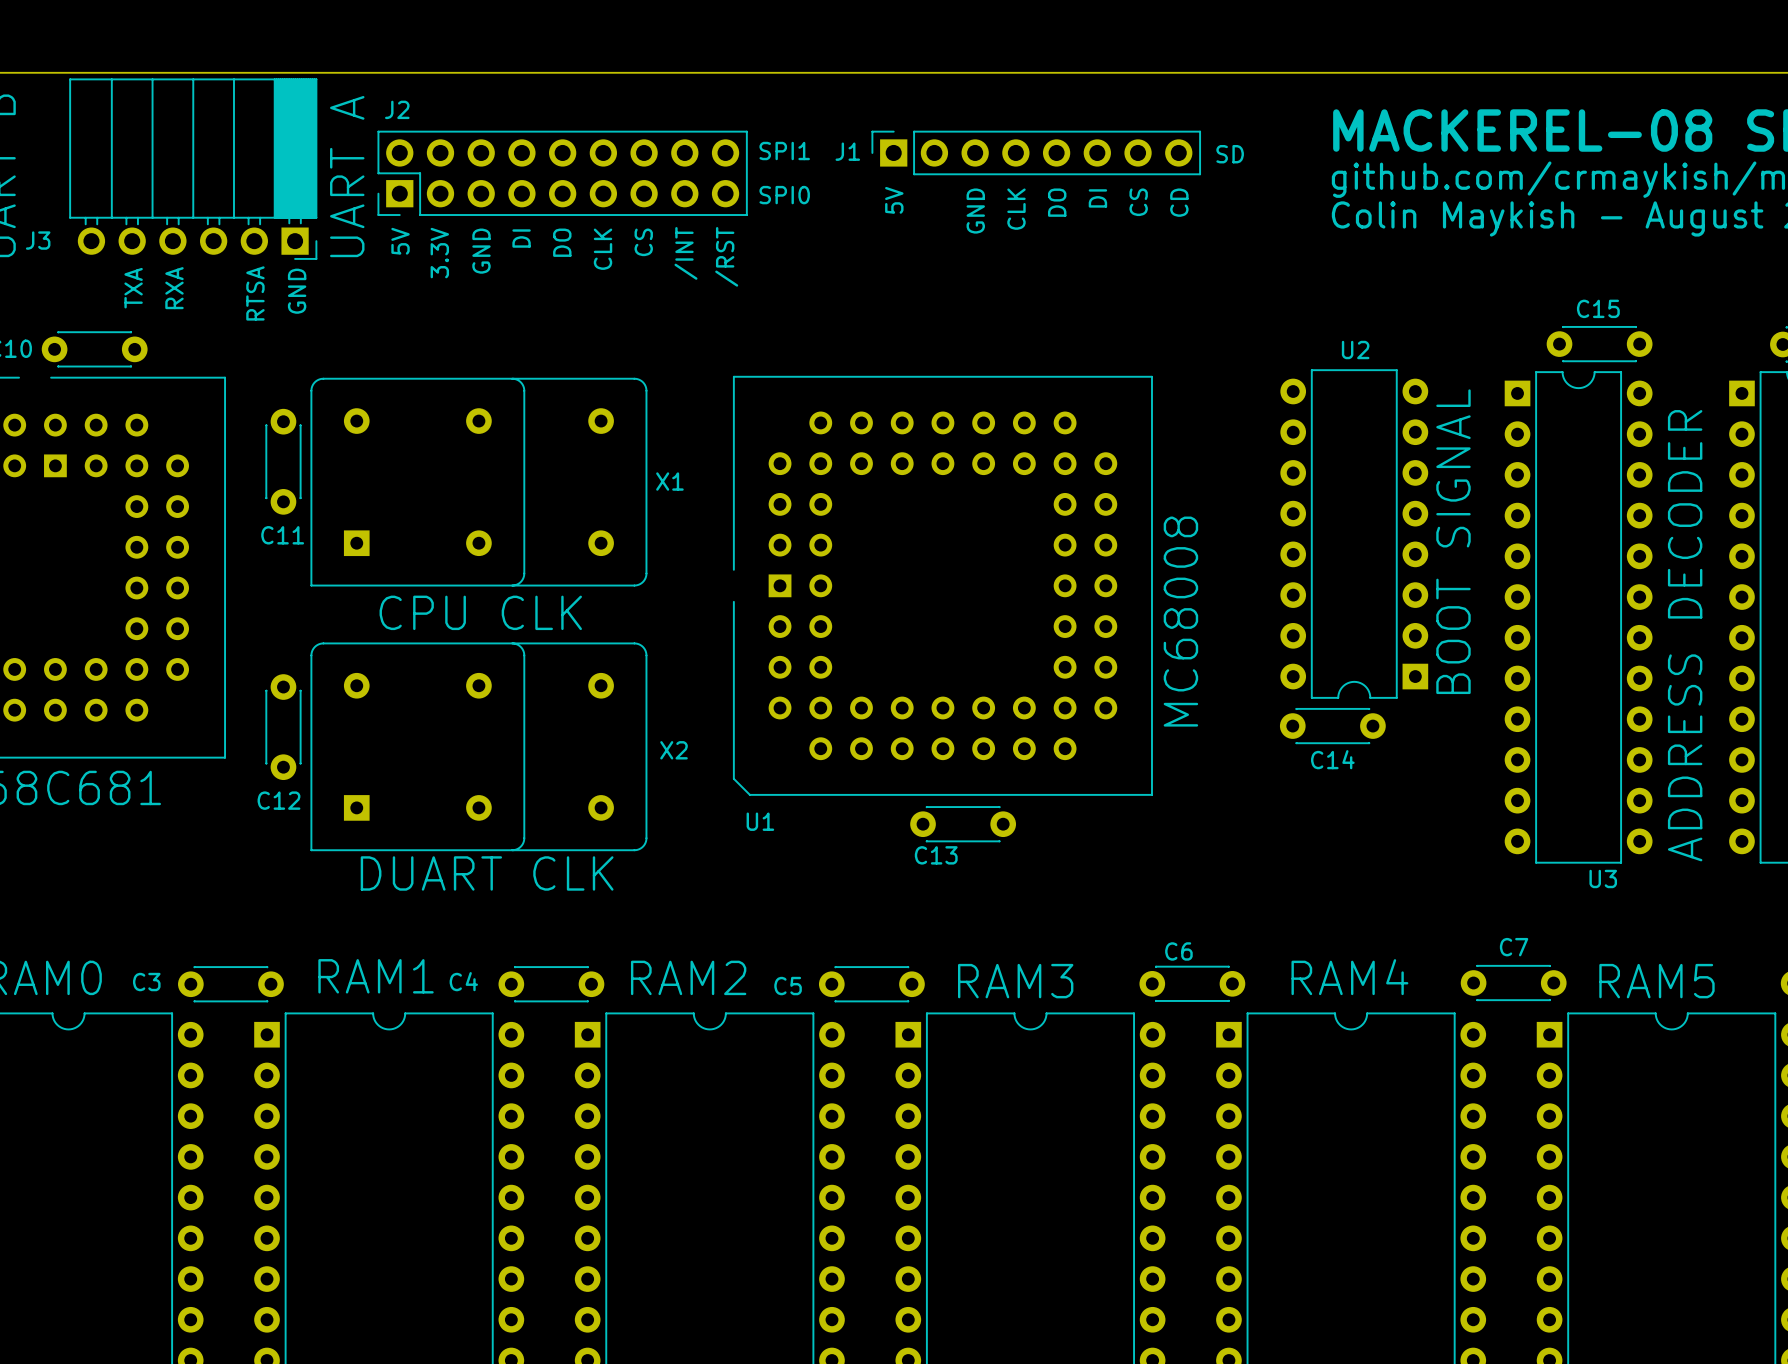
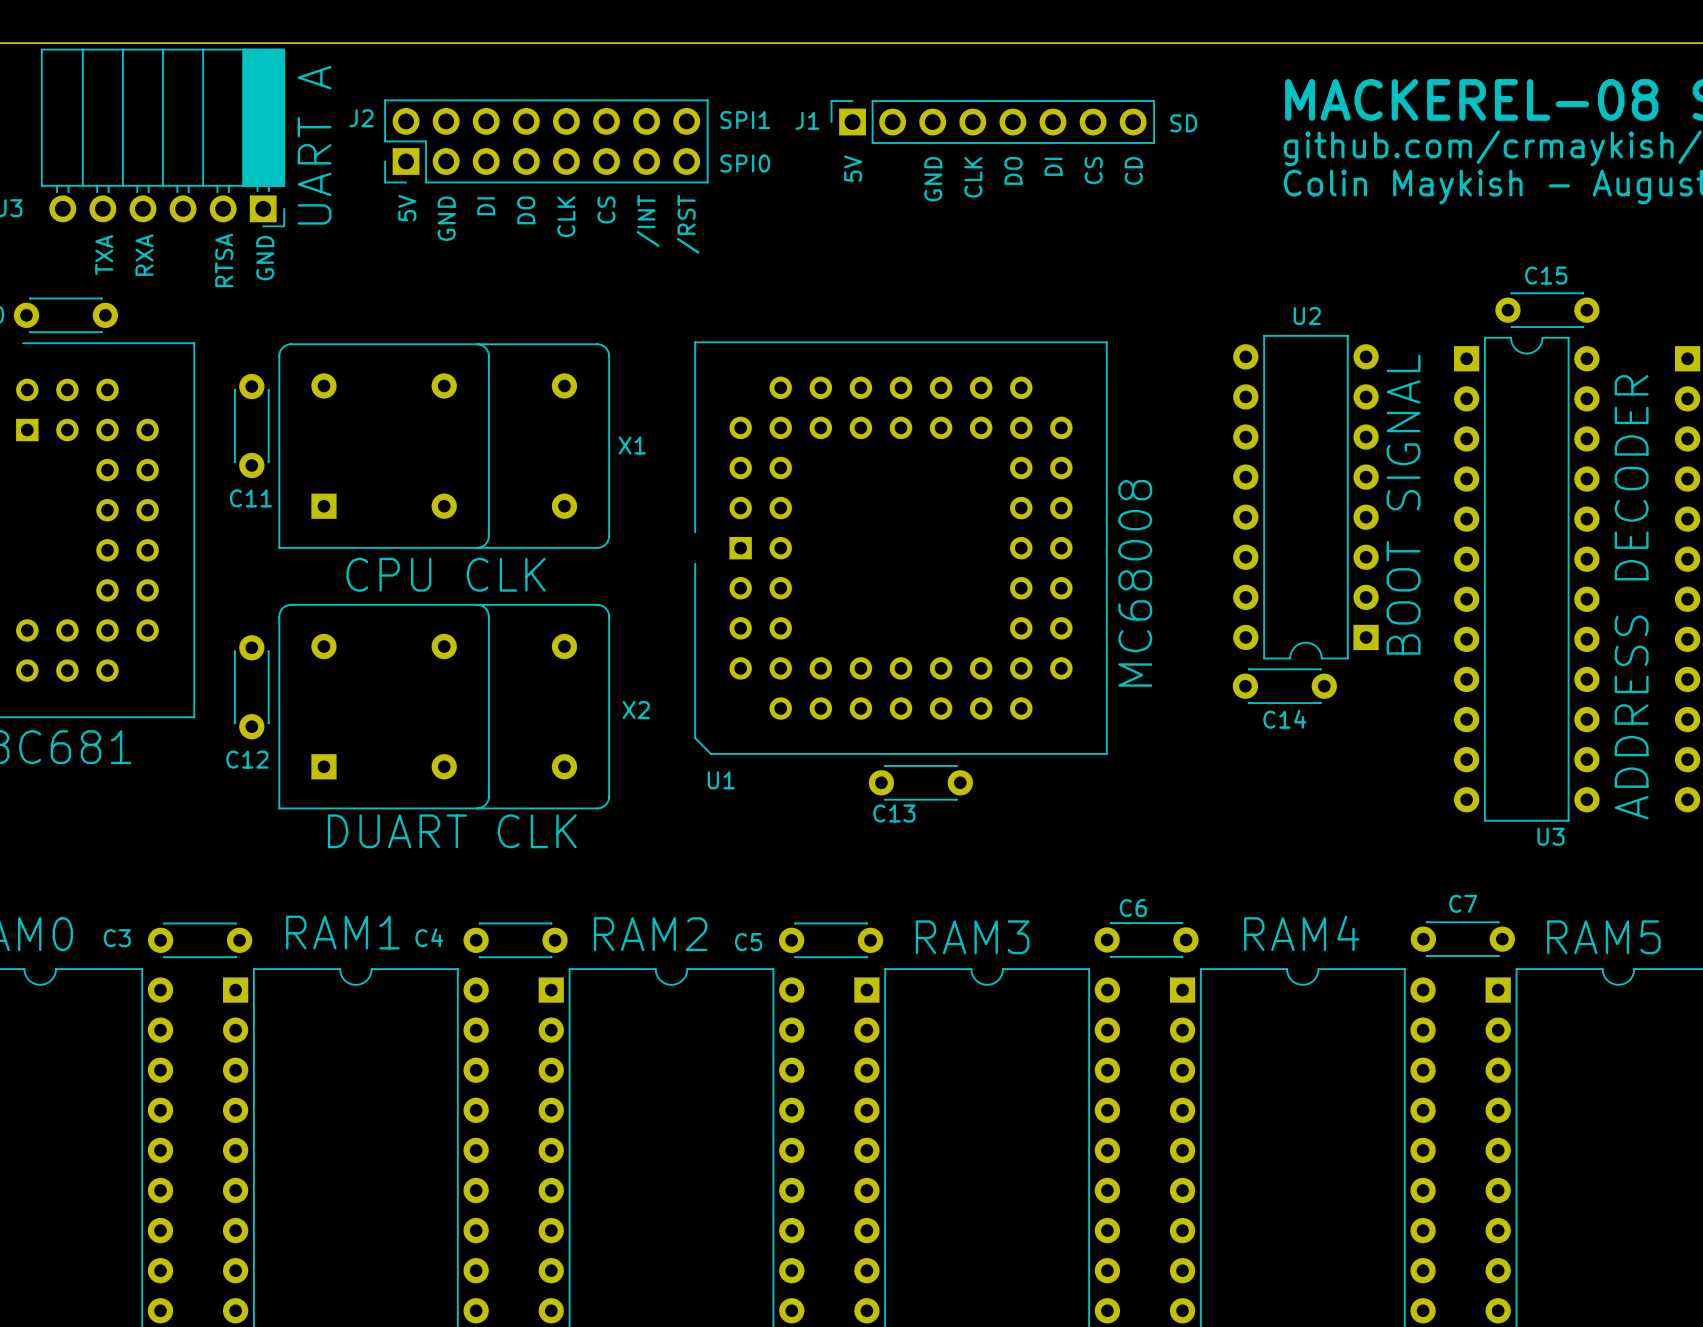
J2 name position: J2 (397, 109) -> J2 (361, 118)
J2 footprint: [377, 130, 748, 216] -> [384, 99, 709, 184]
text: 5V (400, 241) -> none
text: 3.3V (439, 253) -> 5V (407, 208)

